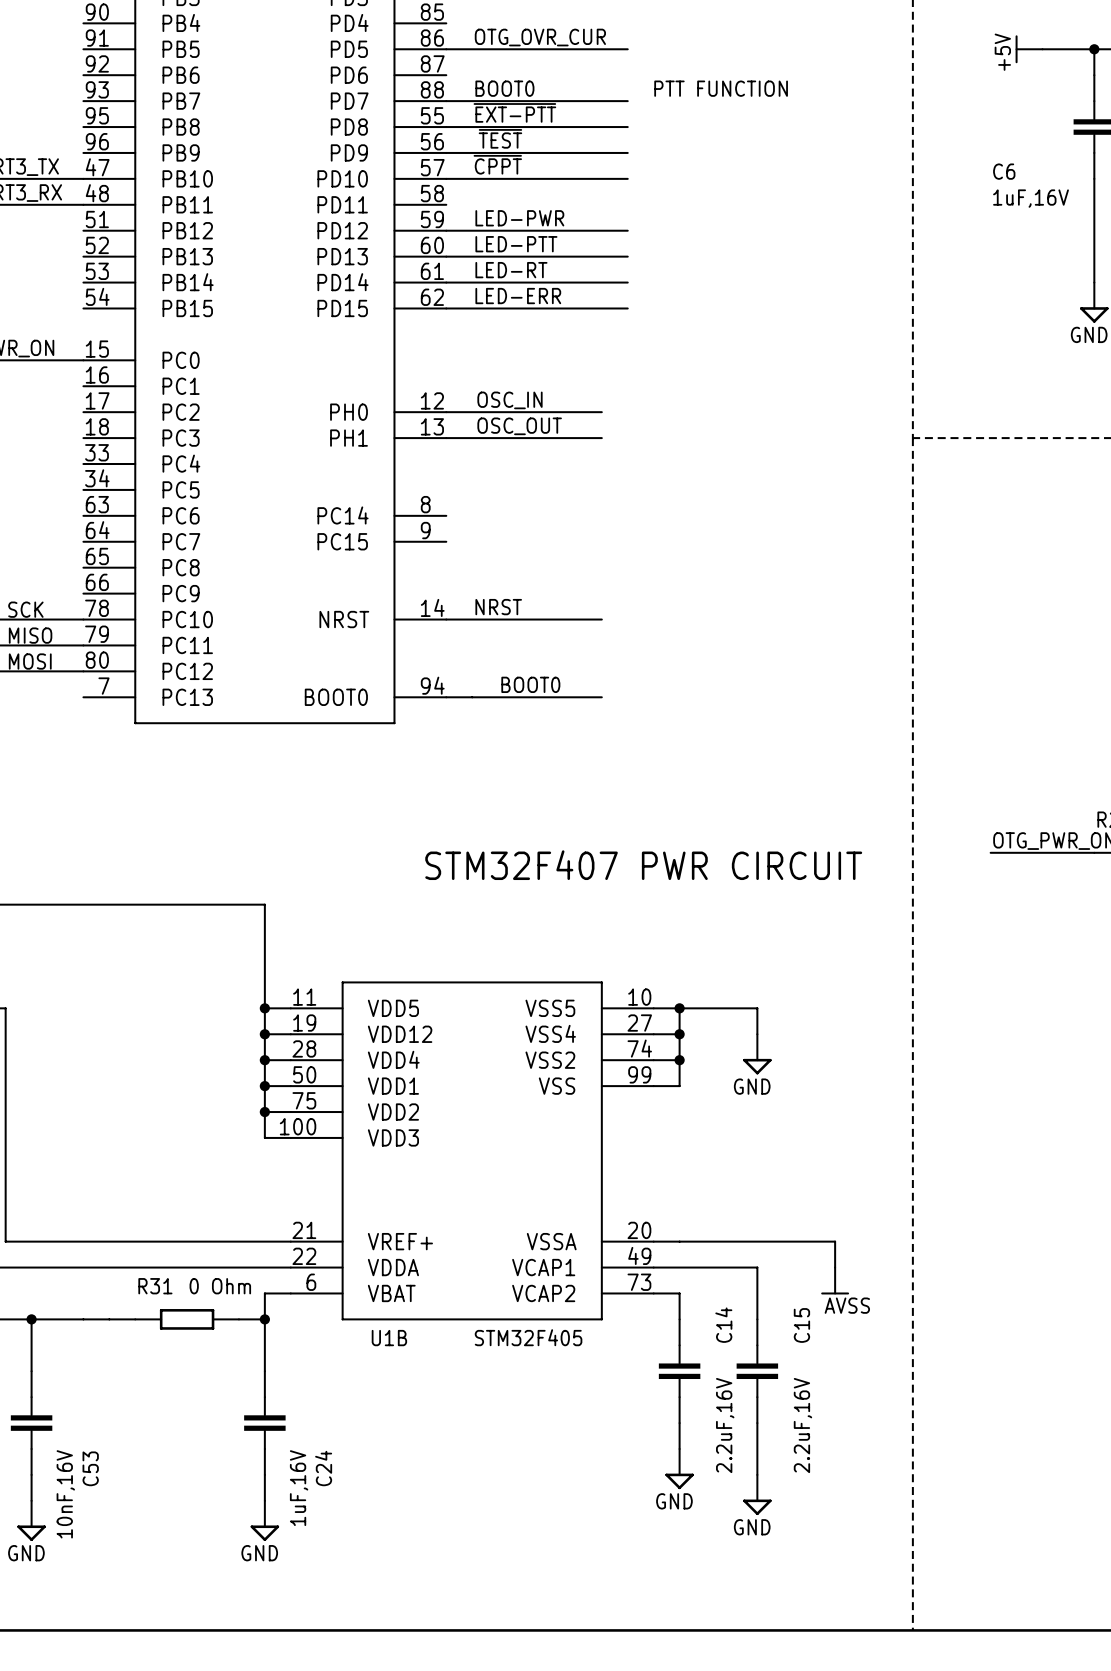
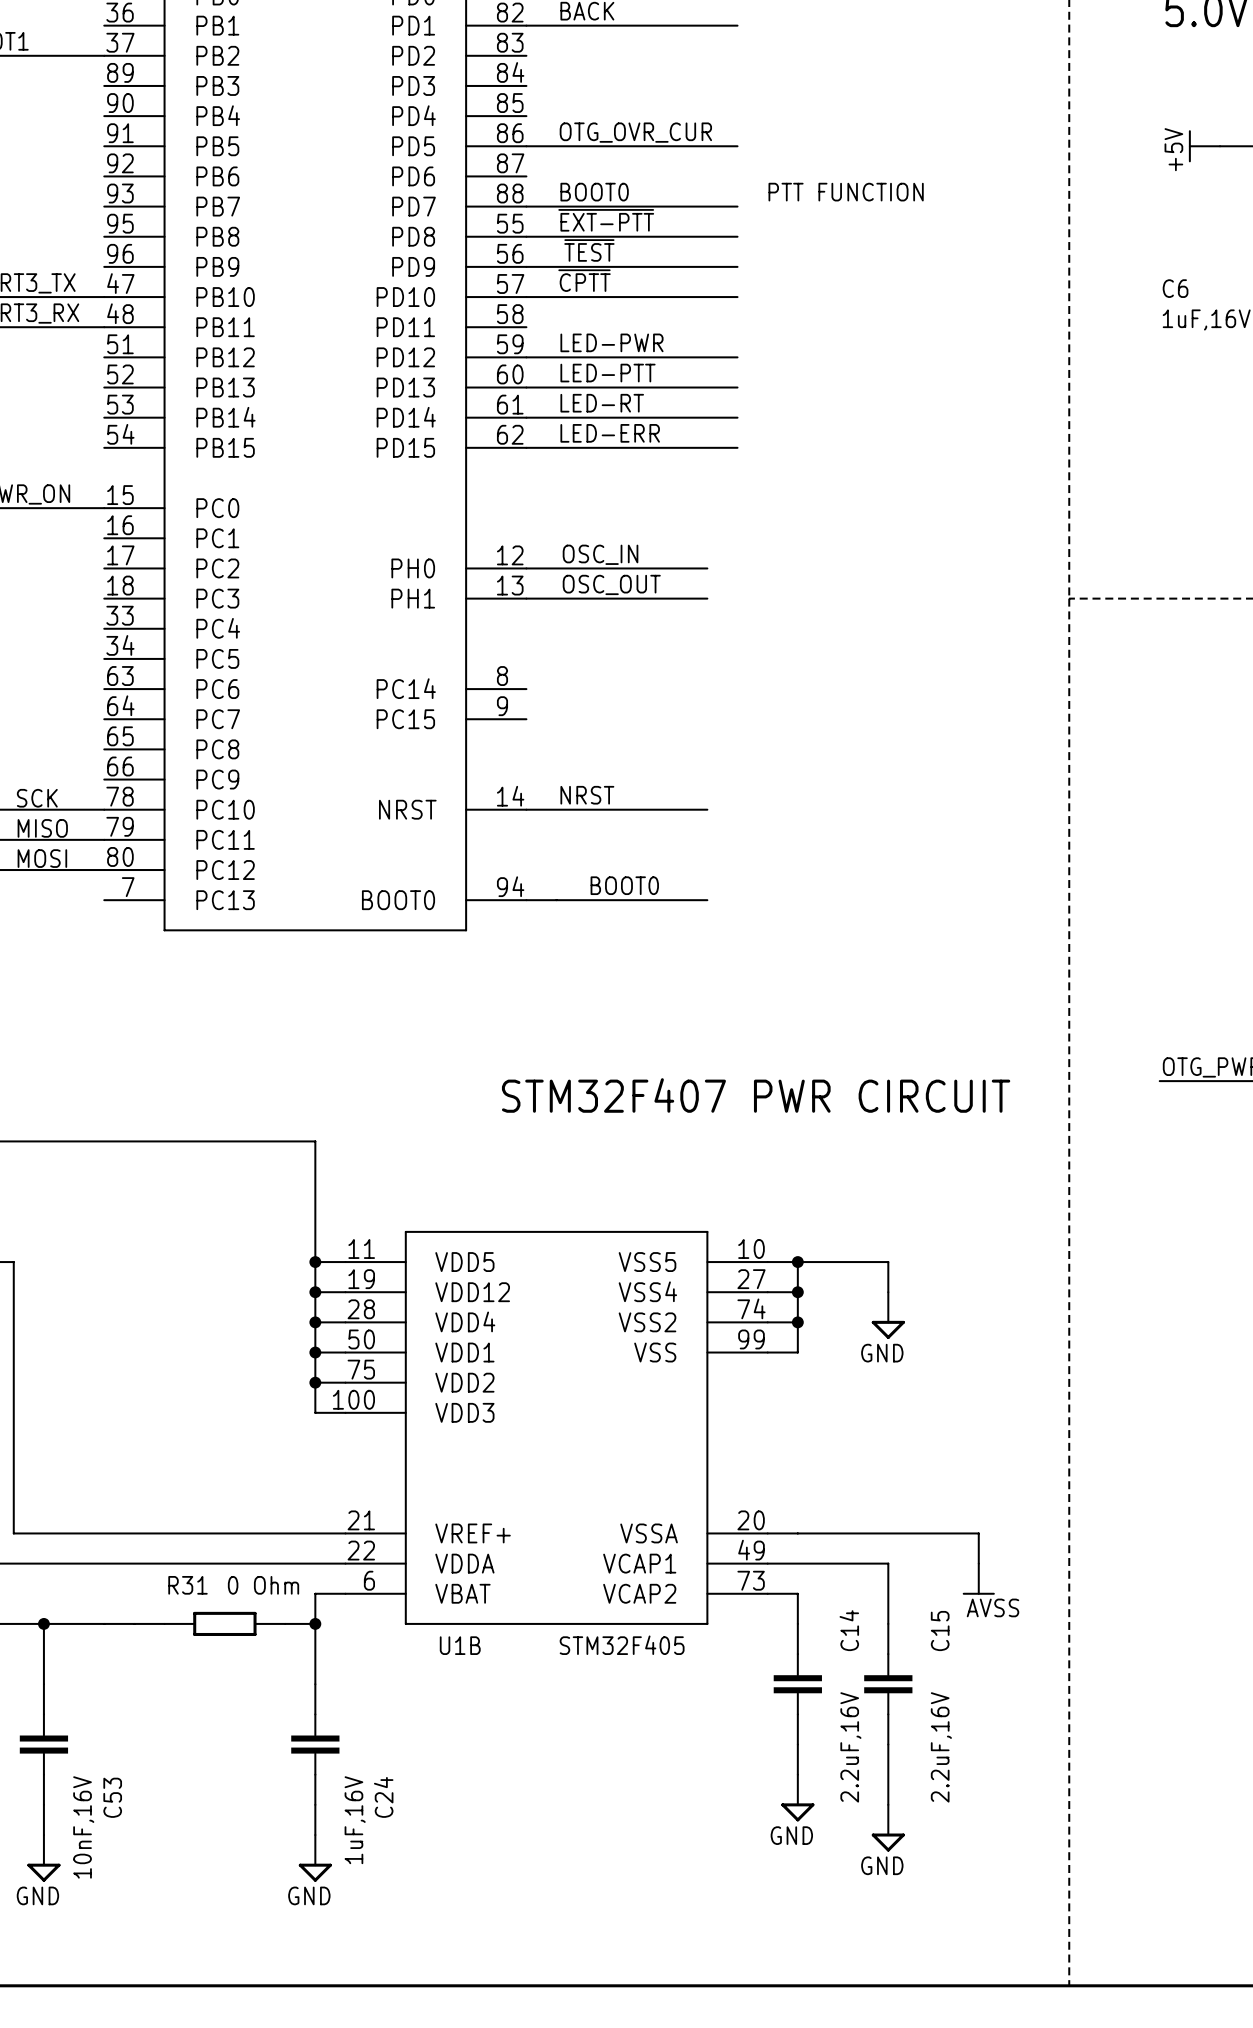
label: ~{CPPT} (497, 164) -> ~{CPTT} (584, 280)

